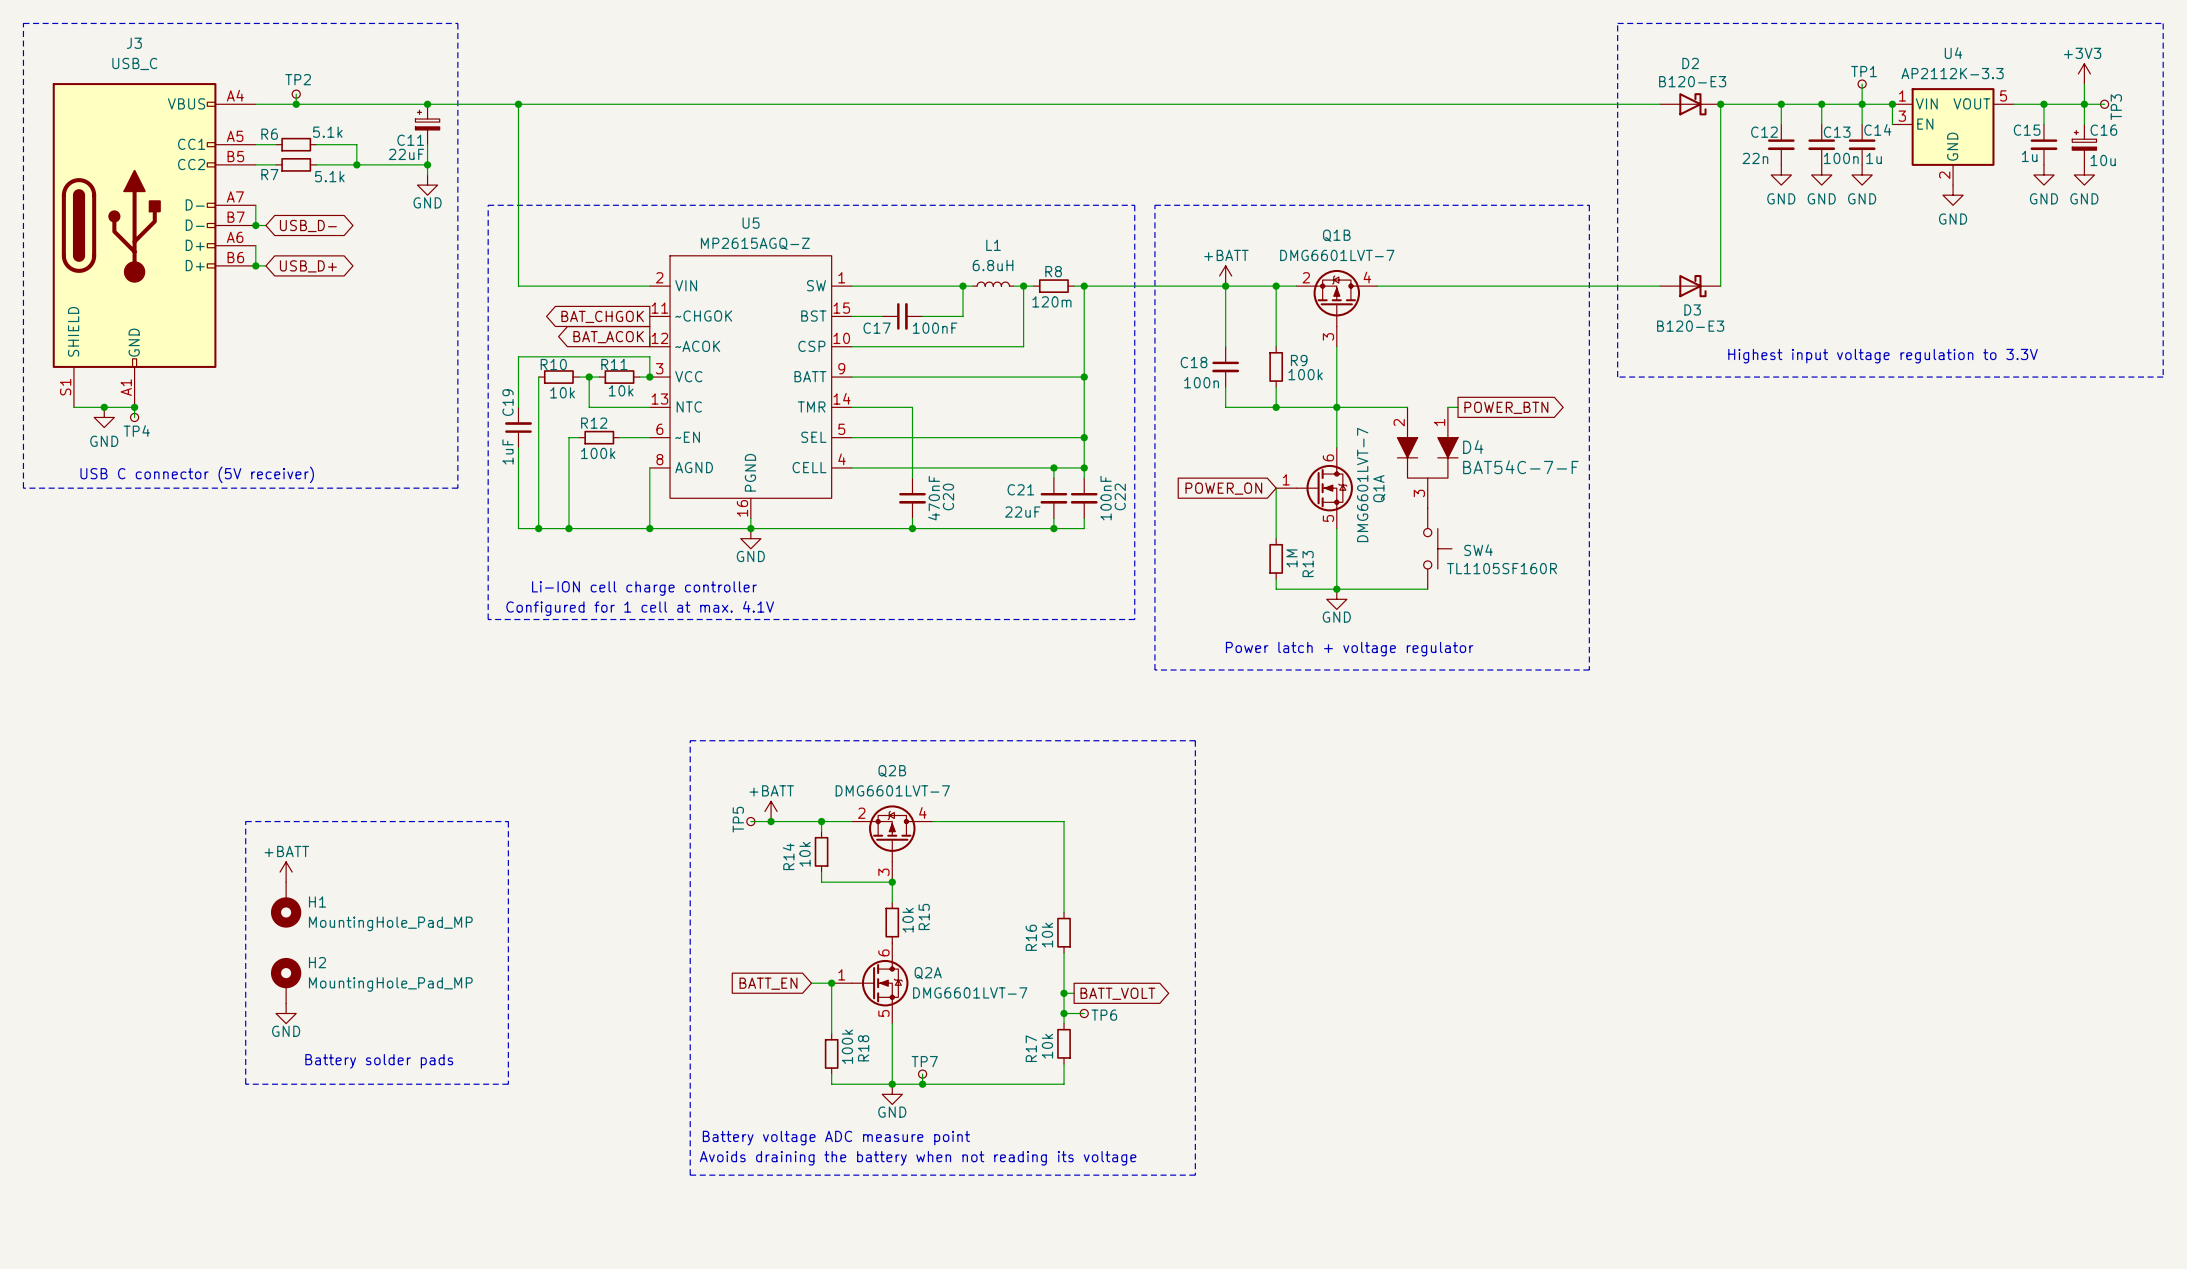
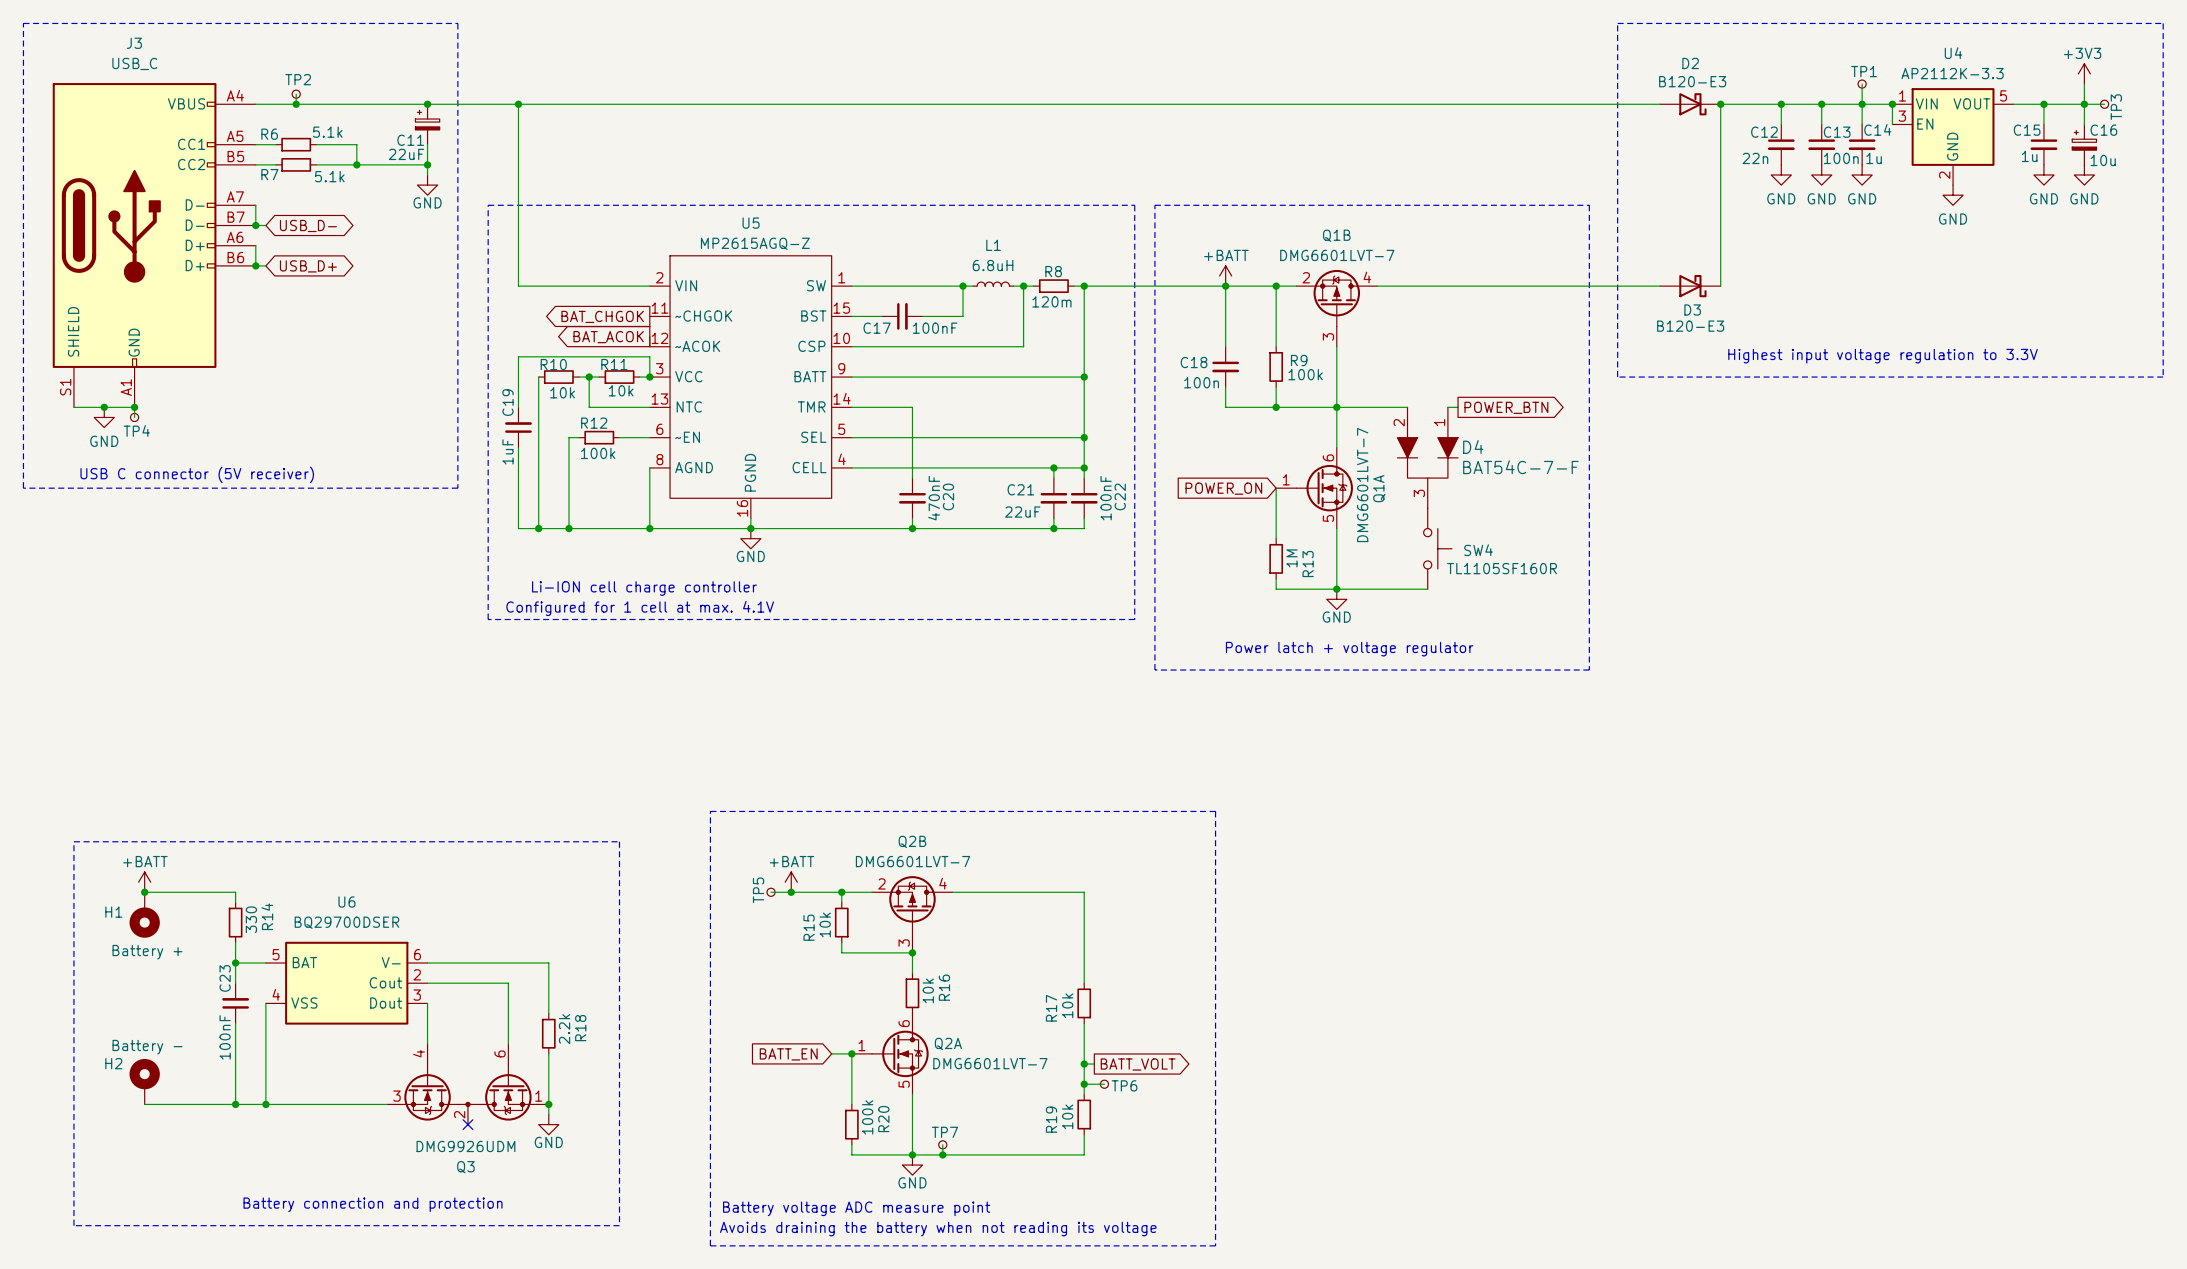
line: (690, 740) (1195, 740) (1195, 1175) (690, 1175) (690, 740) -> (710, 811) (1215, 811) (1215, 1245) (710, 1245) (710, 811)
power symbol position: +BATT (771, 811) -> +BATT (791, 882)
line: (245, 821) (508, 821) (508, 1084) (245, 1084) (245, 821) -> none
wire: (750, 821) (851, 821) -> (771, 892) (872, 892)
TP5 position: (750, 821) -> (771, 892)
junction: (771, 821) -> none
wire: (821, 821) (821, 831) -> (841, 892) (841, 902)
junction: (821, 821) -> none
wire: (932, 821) (1064, 821) (1064, 912) -> (952, 892) (1084, 892) (1084, 983)
line: none -> (73, 841) (619, 841) (619, 1225) (73, 1225) (73, 841)
Q2B position: (892, 843) -> (912, 914)
R14 position: (821, 851) -> (235, 922)
R14 value: 10k (805, 854) -> 330 (251, 919)
R14 name position: R14 (788, 856) -> R14 (267, 916)
power symbol position: +BATT (286, 872) -> +BATT (144, 882)
wire: (821, 872) (821, 882) (892, 882) (892, 902) -> (841, 942) (841, 952) (912, 952) (912, 973)
junction: (892, 882) -> none
wire: none -> (144, 892) (235, 892) (235, 902)
junction: none -> (144, 892)
junction: none -> (791, 892)
junction: none -> (841, 892)
H1 name position: H1 (317, 902) -> H1 (113, 912)
H1 position: (286, 904) -> (144, 915)
R15 name position: R15 (924, 916) -> R15 (809, 927)
R15 value position: 10k (908, 920) -> 10k (825, 924)
R15 position: (892, 922) -> (841, 922)
H1 value: MountingHole_Pad_MP (390, 923) -> Battery + (147, 952)
R16 position: (1064, 932) -> (912, 993)
R16 value position: 10k (1047, 935) -> 10k (928, 990)
R16 name position: R16 (1031, 937) -> R16 (944, 987)
wire: none -> (235, 942) (235, 983)
junction: none -> (912, 952)
wire: (1064, 952) (1064, 1023) -> (1084, 1023) (1084, 1094)
wire: none -> (235, 962) (265, 962)
junction: none -> (235, 962)
H2 name position: H2 (317, 962) -> H2 (113, 1063)
wire: none -> (427, 962) (548, 962) (548, 1013)
H2 position: (286, 980) -> (144, 1081)
U6: none -> BQ29700DSER (346, 983)
wire: none -> (427, 983) (508, 983) (508, 1043)
global label position: BATT_EN (768, 983) -> BATT_EN (788, 1054)
wire: (811, 983) (831, 983) (831, 1033) -> (831, 1053) (851, 1053) (851, 1104)
junction: (831, 983) -> none
Q2A position: (870, 983) -> (890, 1053)
H2 value: MountingHole_Pad_MP (390, 984) -> Battery - (147, 1047)
wire: (1064, 993) (1074, 993) -> (1084, 1064) (1094, 1064)
junction: (1064, 993) -> none
global label position: BATT_VOLT (1117, 993) -> BATT_VOLT (1138, 1064)
C23: none -> 100nF (235, 1003)
wire: none -> (265, 1003) (265, 1104)
wire: none -> (427, 1003) (427, 1043)
power symbol: GND (286, 1013) -> none
wire: (1064, 1013) (1084, 1013) -> (1084, 1084) (1104, 1084)
junction: (1064, 1013) -> none
TP6 position: (1084, 1013) -> (1104, 1084)
wire: none -> (235, 1023) (235, 1104)
wire: (892, 1023) (892, 1084) -> (912, 1094) (912, 1154)
R17 position: (1064, 1043) -> (1084, 1003)
R18 value: 100k (847, 1046) -> 2.2k (564, 1029)
wire: none -> (548, 1053) (548, 1114)
R18 position: (831, 1053) -> (548, 1033)
junction: none -> (851, 1053)
text: Battery solder pads (379, 1061) -> none
wire: (1064, 1064) (1064, 1084) (831, 1084) (831, 1074) -> (1084, 1134) (1084, 1154) (851, 1154) (851, 1144)
junction: none -> (1084, 1064)
wire: (922, 1074) (922, 1084) -> (942, 1144) (942, 1154)
TP7 position: (922, 1074) -> (942, 1144)
Q3: none -> DMG9926UDM (467, 1084)
junction: (892, 1084) -> none
junction: (922, 1084) -> none
junction: none -> (1084, 1084)
power symbol position: GND (892, 1094) -> GND (912, 1165)
wire: none -> (144, 1104) (387, 1104)
junction: none -> (235, 1104)
junction: none -> (265, 1104)
junction: none -> (548, 1104)
R19: none -> 10k (1084, 1114)
no-connect mark: none -> (467, 1124)
power symbol: none -> GND (548, 1124)
R20: none -> 100k (851, 1124)
text position: Battery voltage ADC measure point (836, 1138) -> Battery voltage ADC measure point (856, 1208)
junction: none -> (912, 1154)
junction: none -> (942, 1154)
text position: Avoids draining the battery when not reading its voltage (918, 1158) -> Avoids draining the battery when not reading its voltage (938, 1229)
text: none -> Battery connection and protection (373, 1204)

